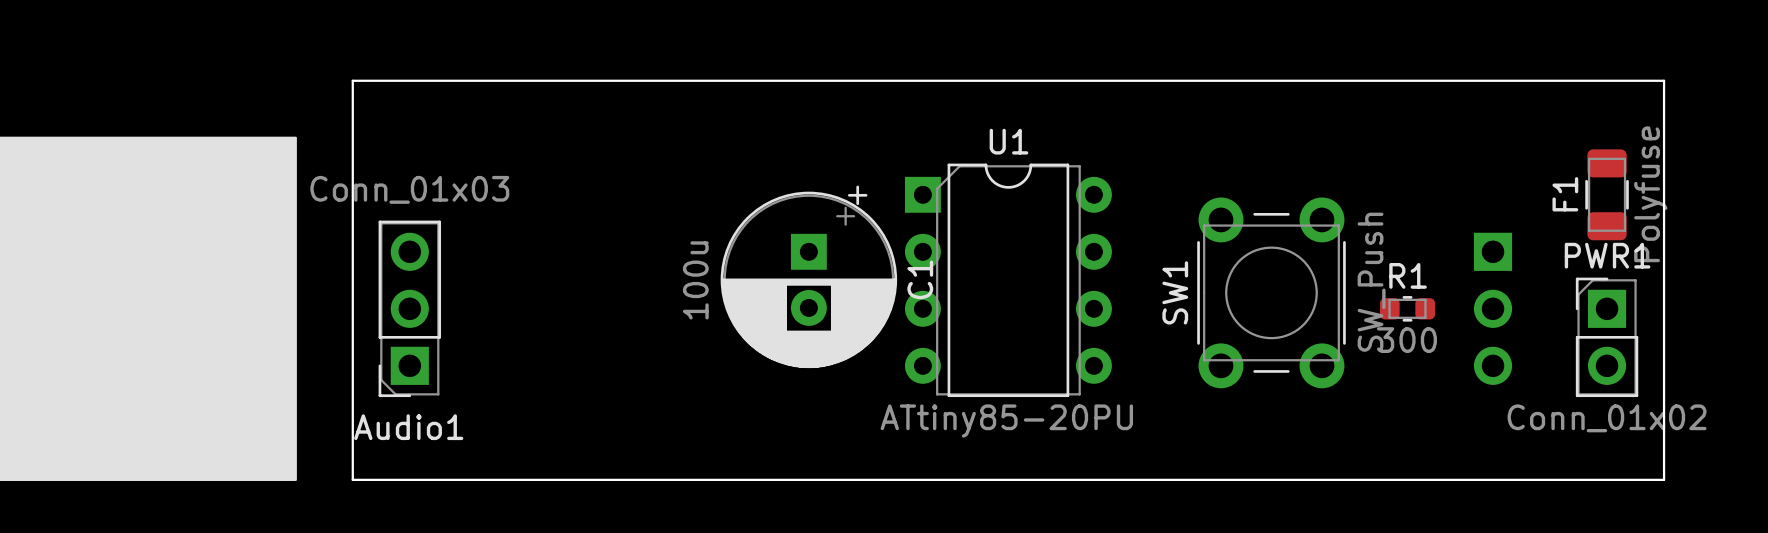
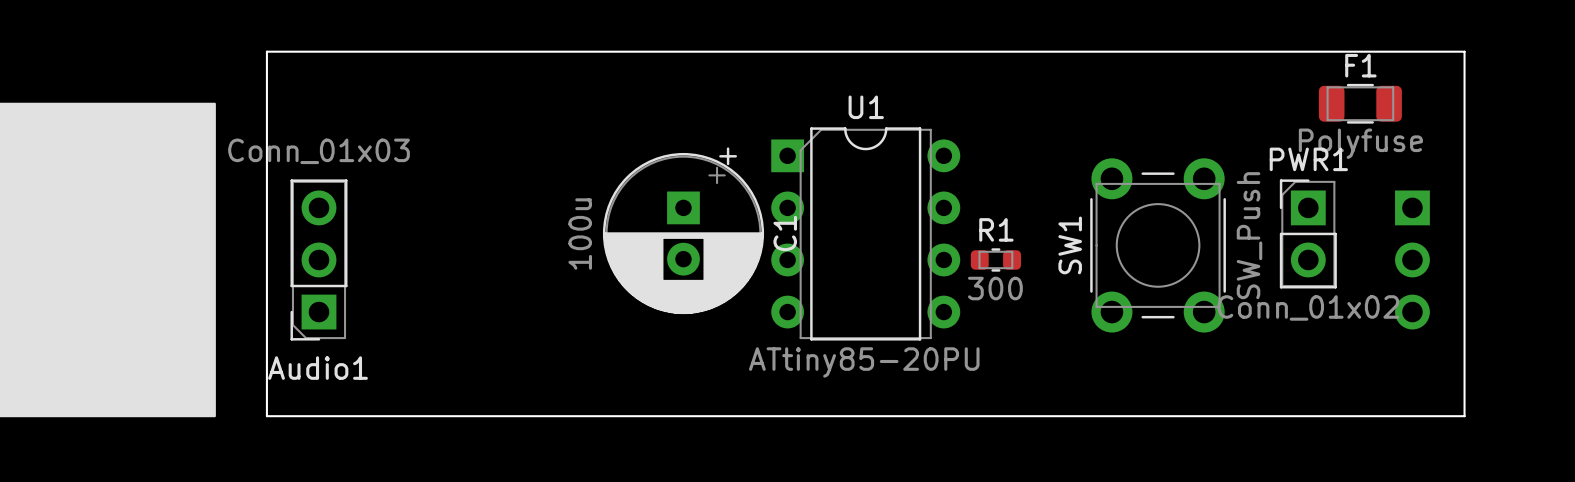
F1 rotation: 0° (1607, 194) -> 90° clockwise (1360, 103)
F1 position: (1607, 194) -> (1360, 103)
SW1 position: (1271, 292) -> (1158, 245)
R1 position: (1407, 308) -> (995, 259)
part position: (1493, 308) -> (1412, 259)
PWR1 position: (1607, 337) -> (1308, 233)

